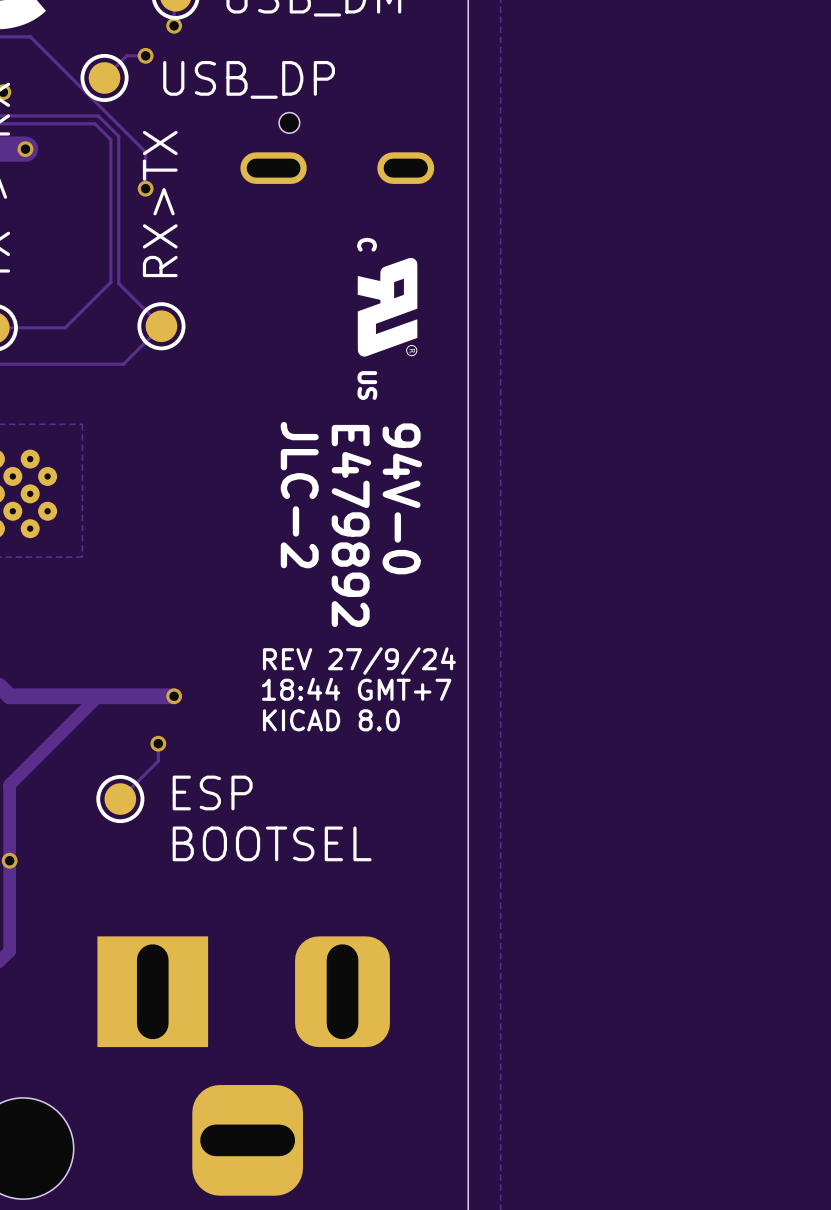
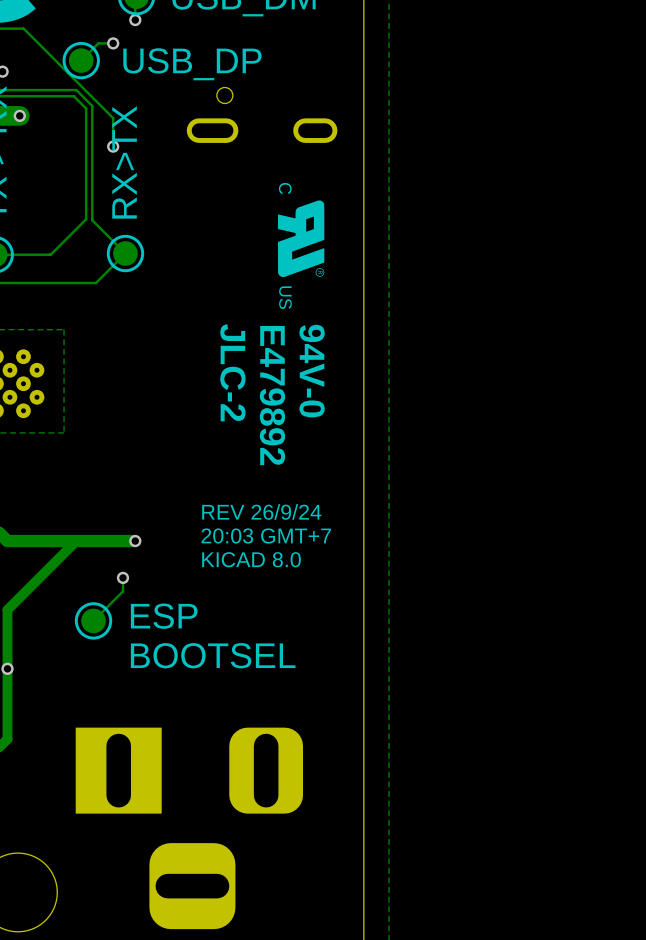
text: REV 27/9/24 (359, 661) -> REV 26/9/24 (261, 511)
text: 18:44 GMT+7 (356, 689) -> 20:03 GMT+7 (266, 535)

